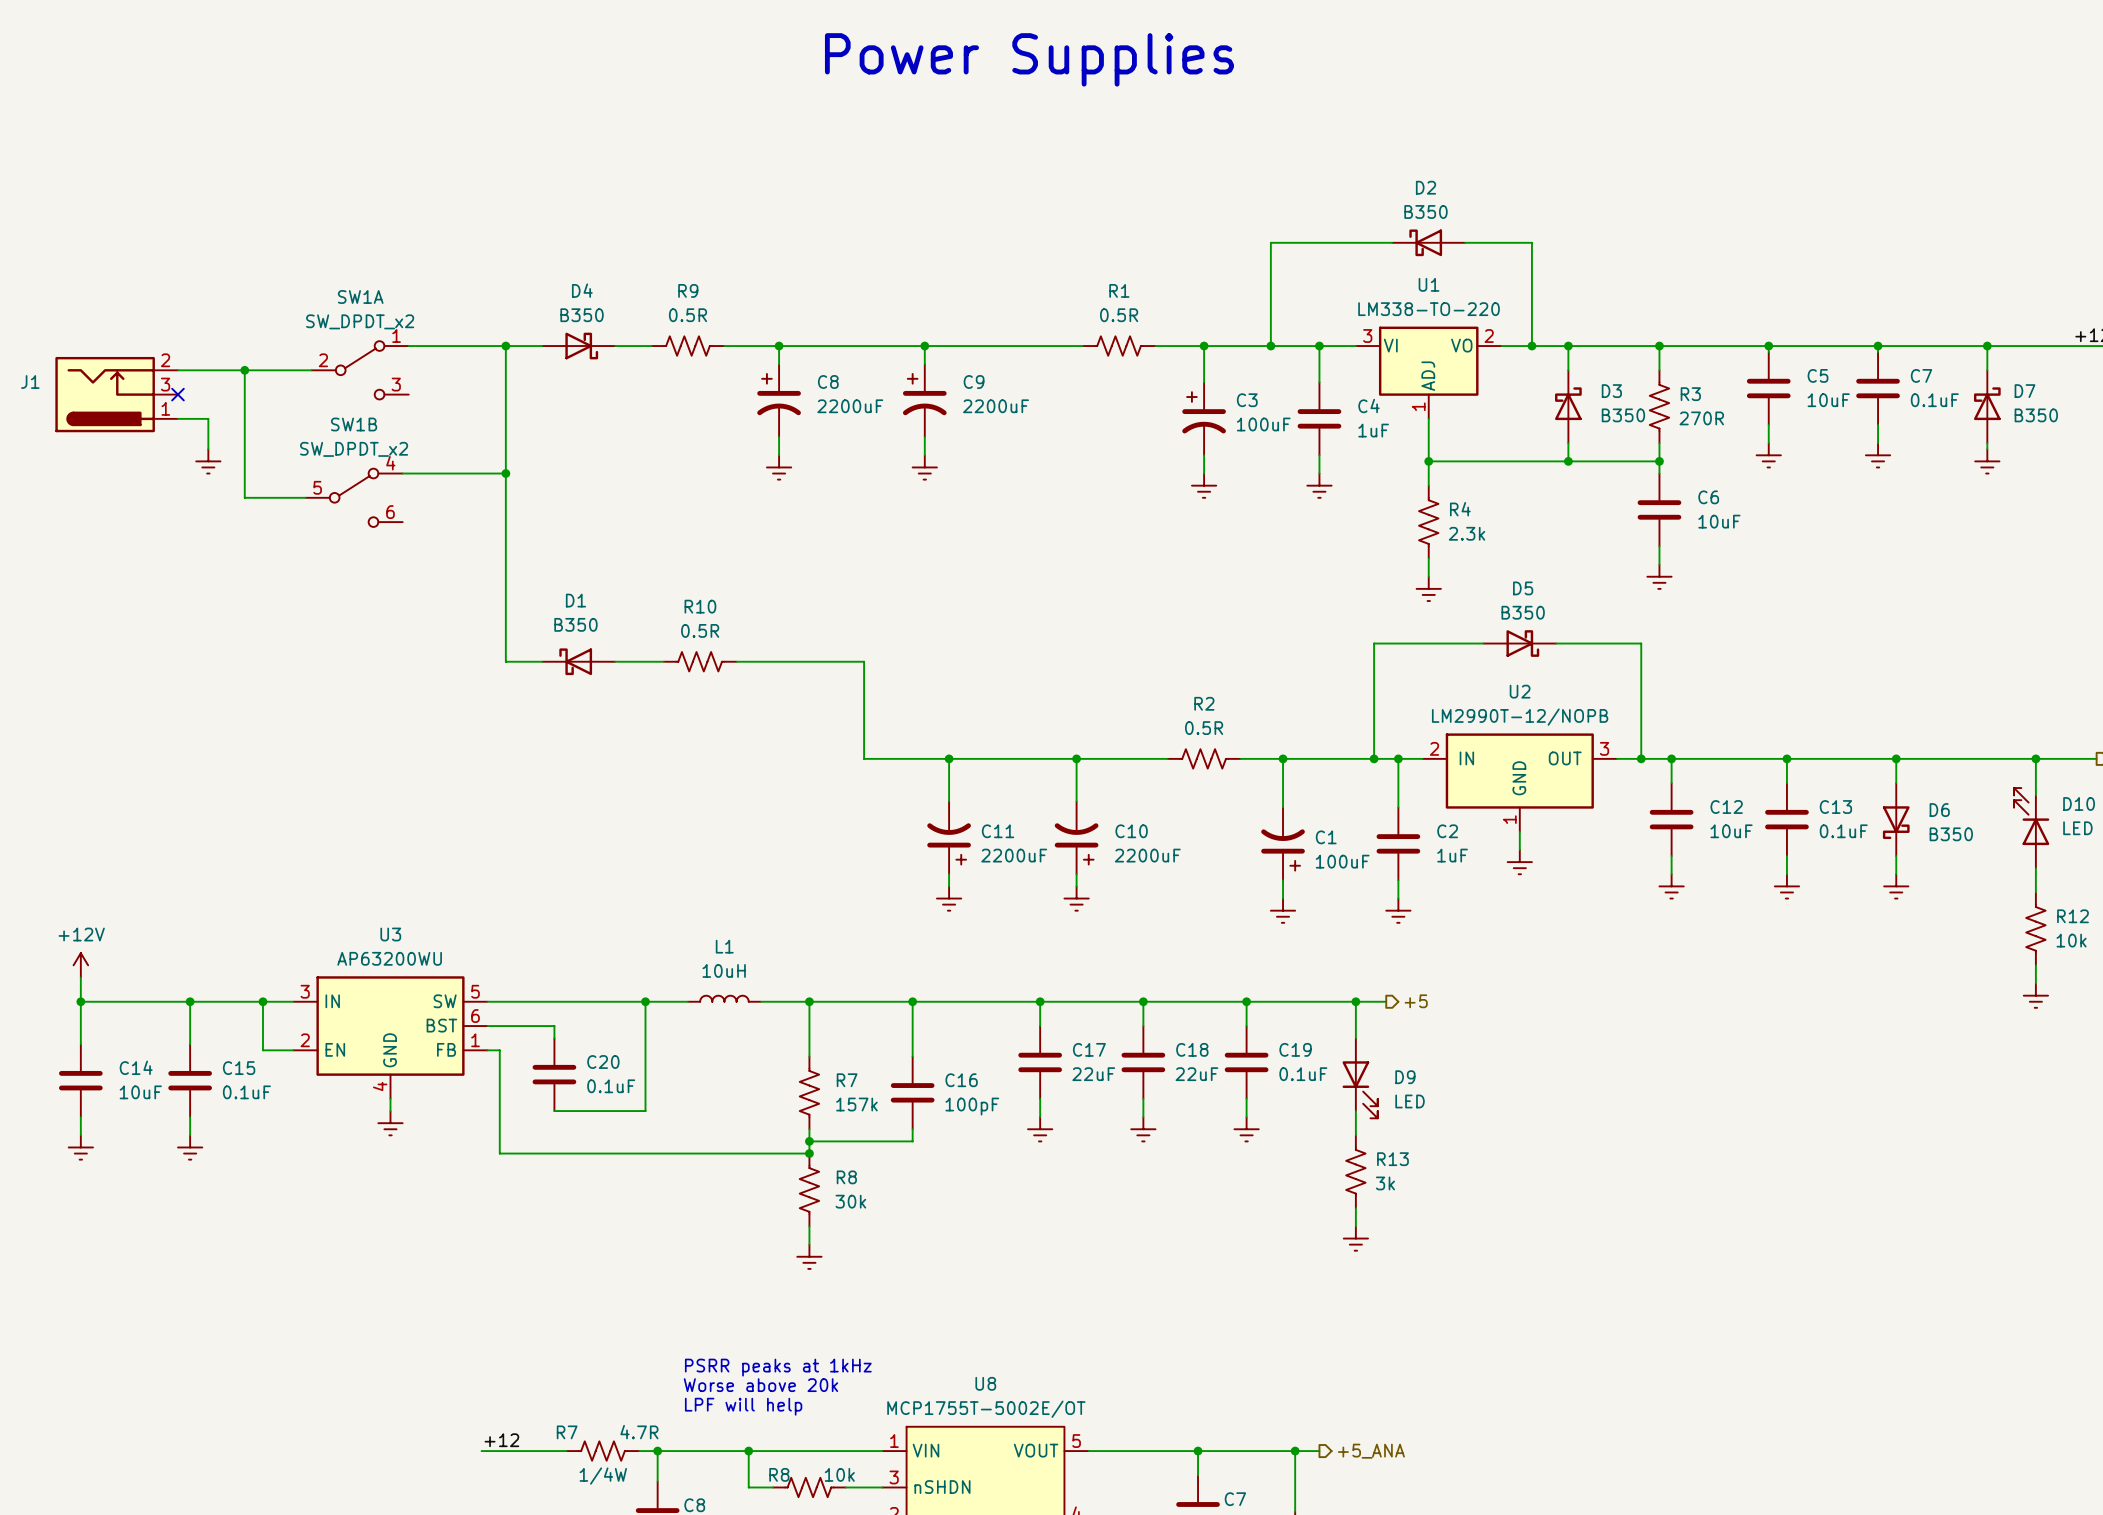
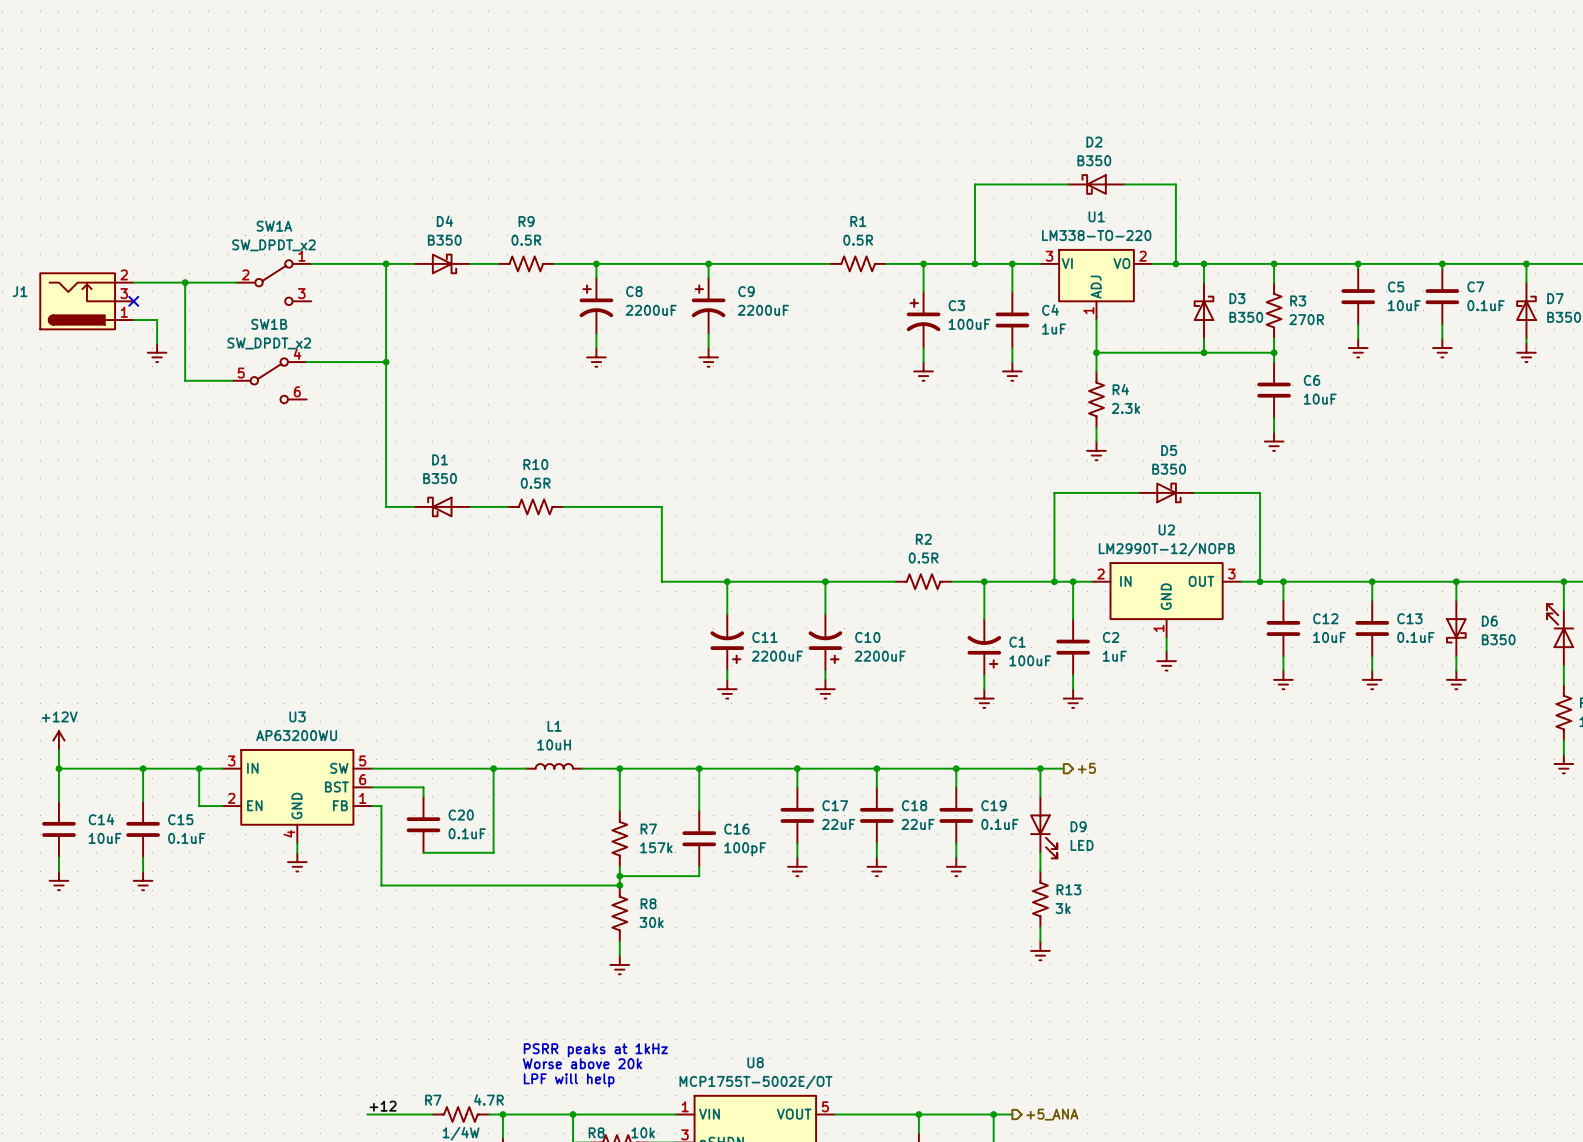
text: Power Supplies (1029, 59) -> none

